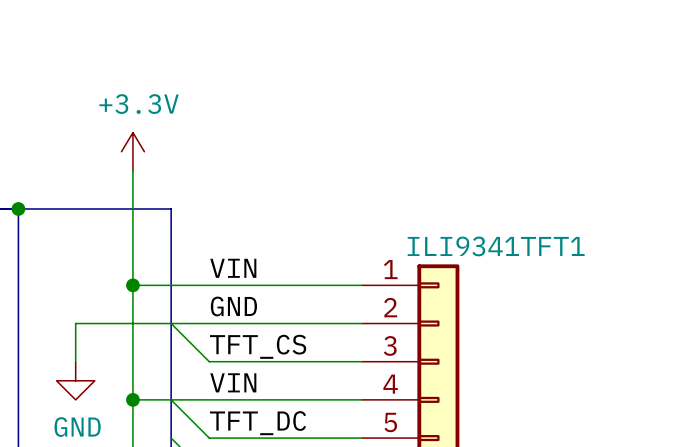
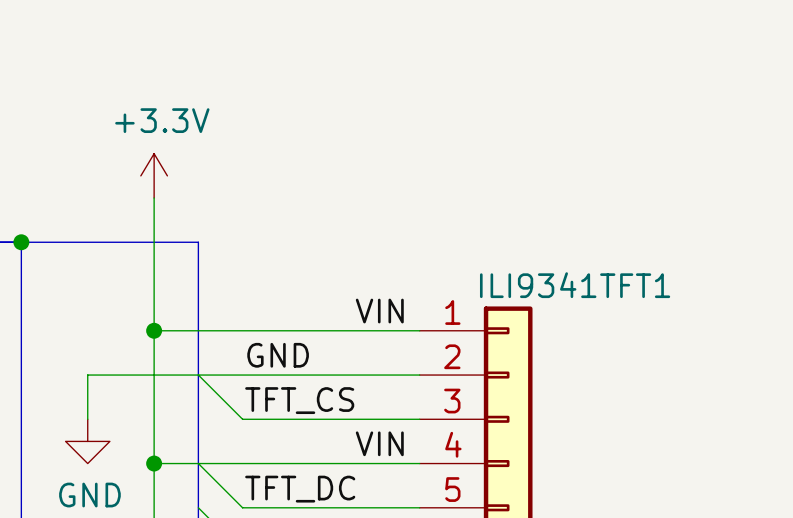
label: VIN (233, 268) -> none
label: none -> VIN (379, 311)
label: VIN (233, 382) -> none
label: none -> VIN (379, 443)

